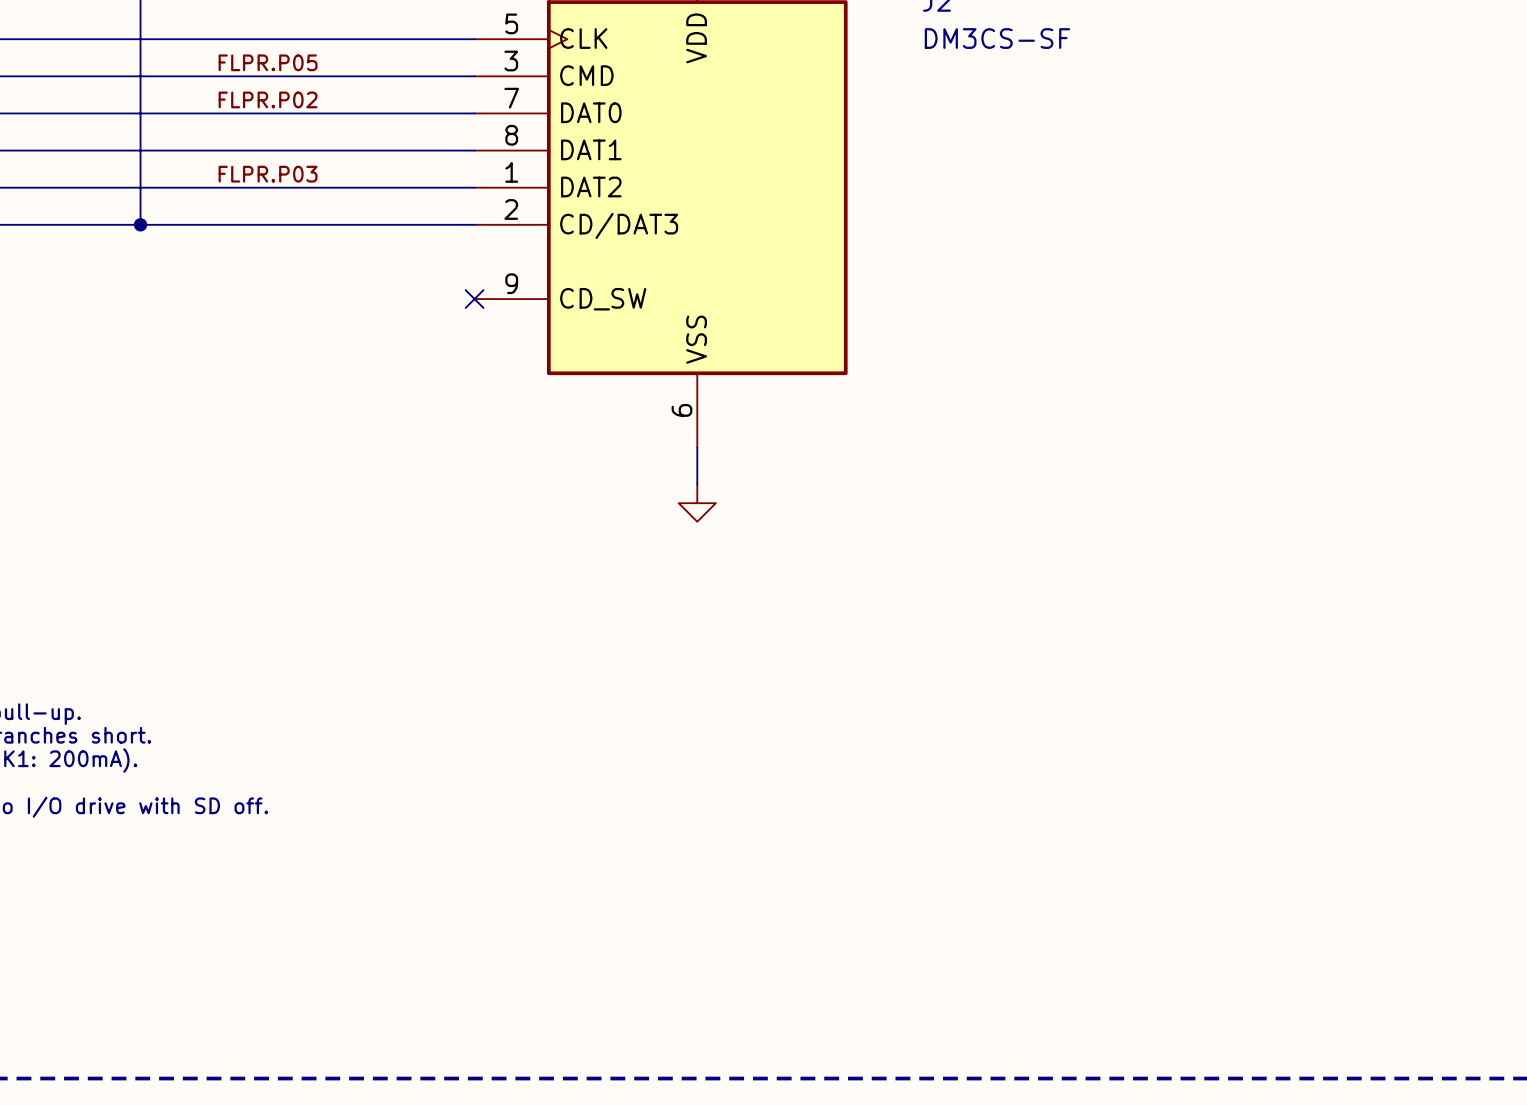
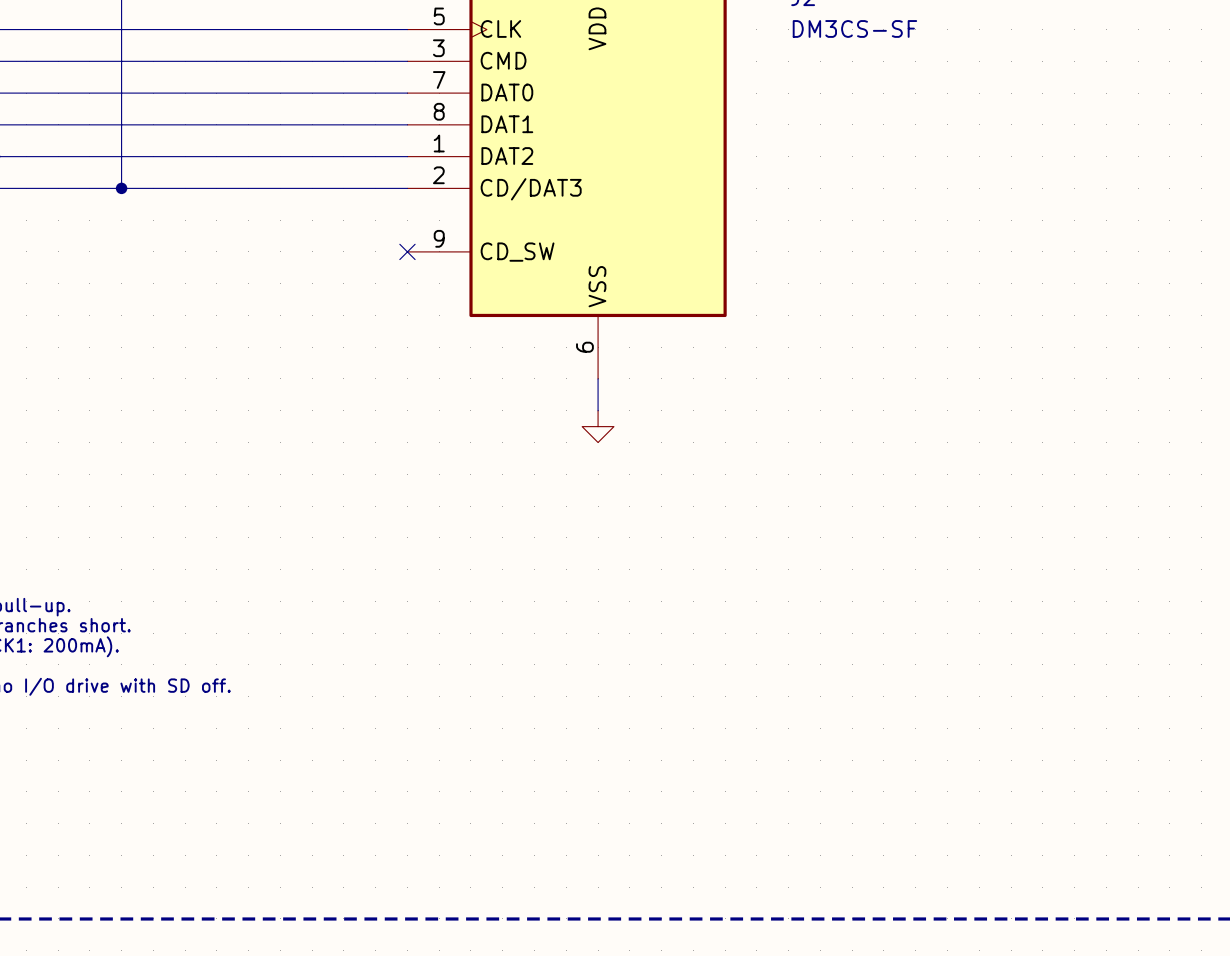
label: FLPR.P05 (268, 62) -> none
label: FLPR.P02 (268, 99) -> none
label: FLPR.P03 (268, 174) -> none

